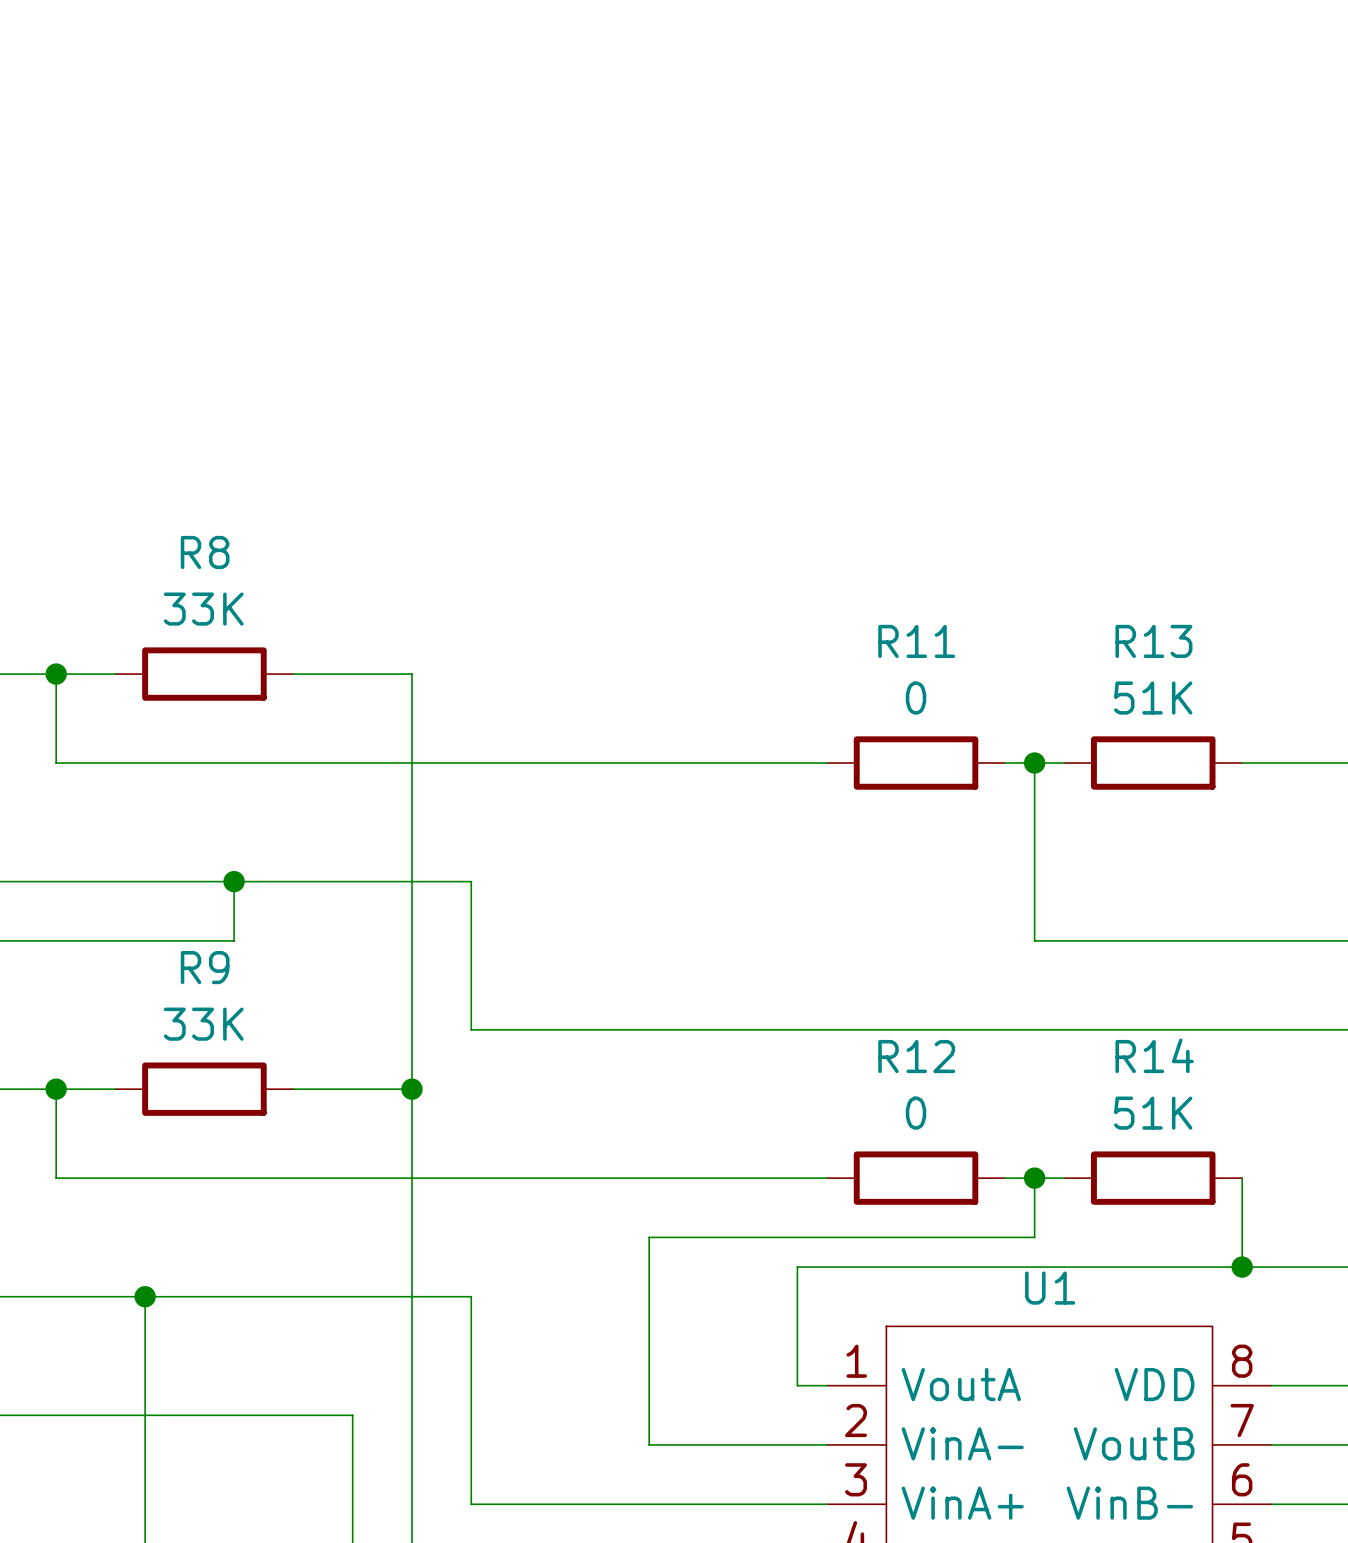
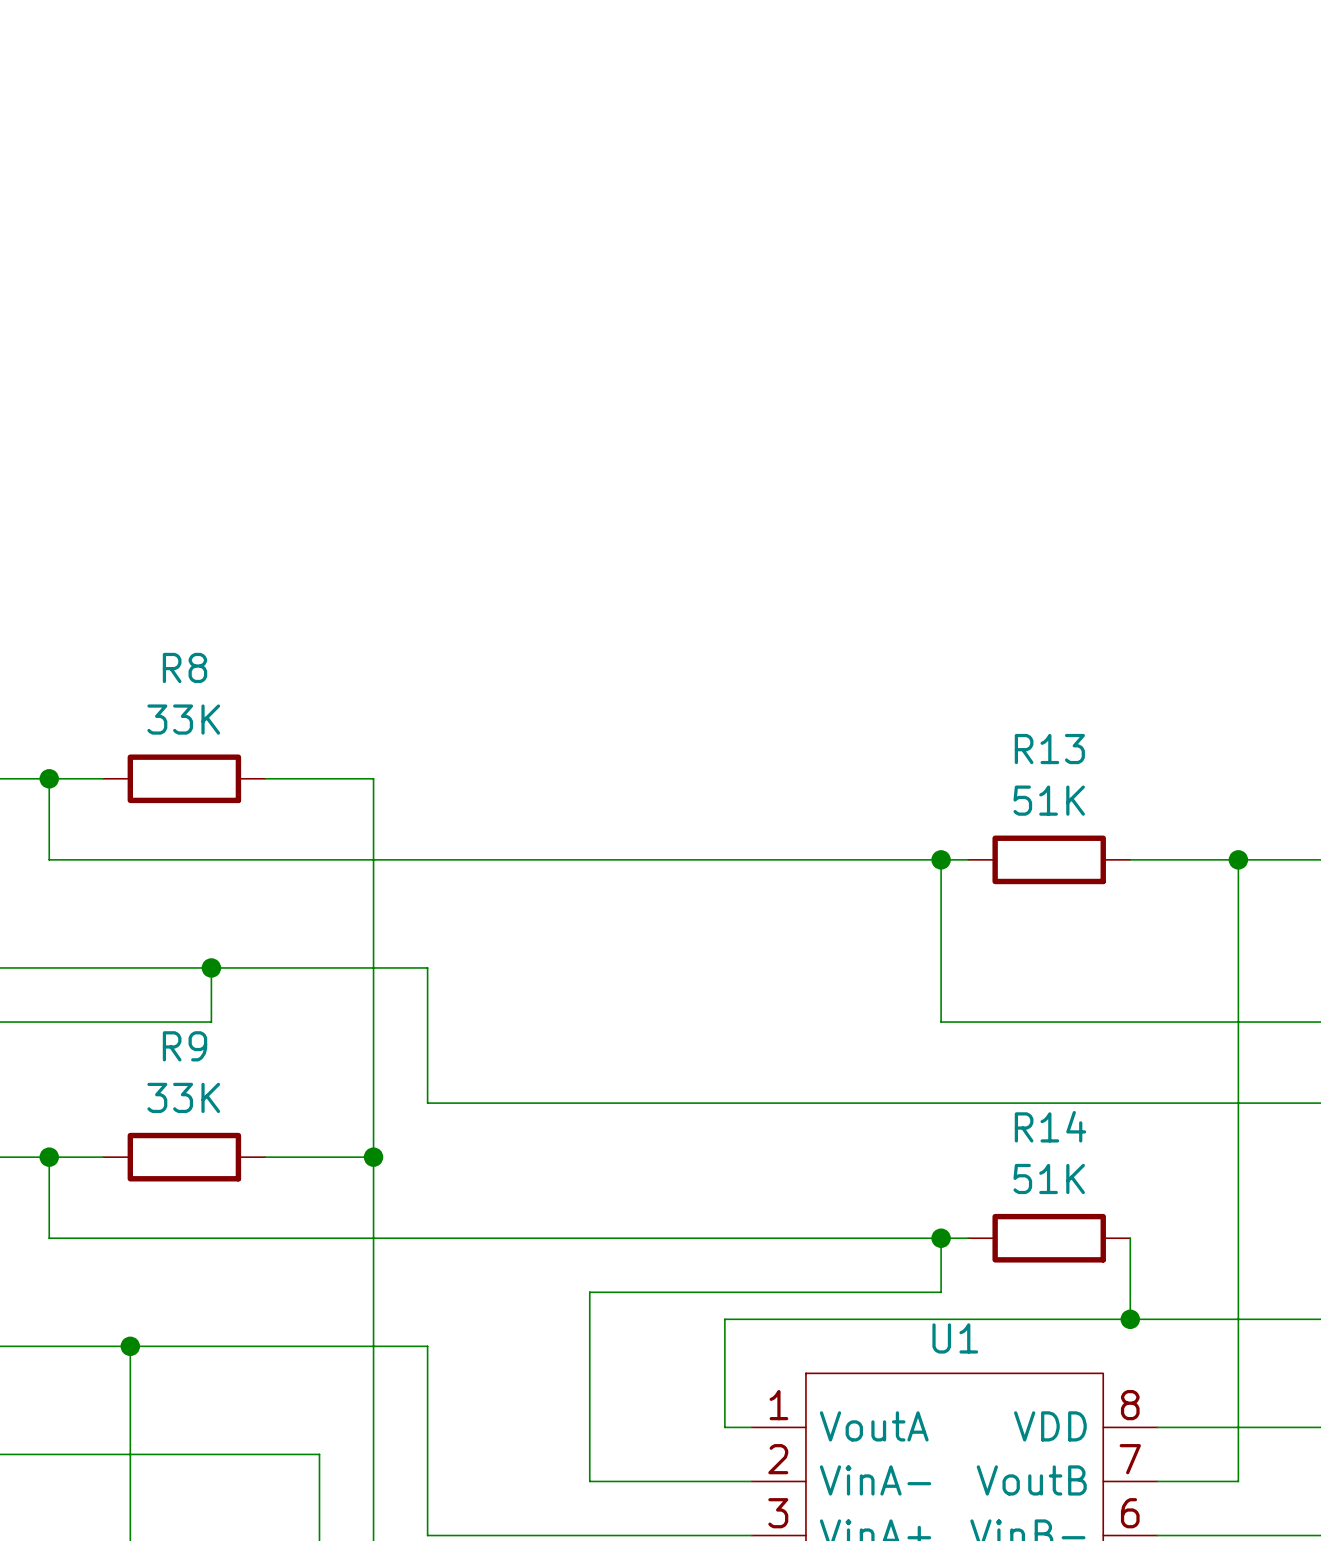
wire: none -> (751, 859) (914, 859)
R11: 0 (916, 763) -> none
wire: none -> (751, 1238) (914, 1238)
R12: 0 (916, 1178) -> none

